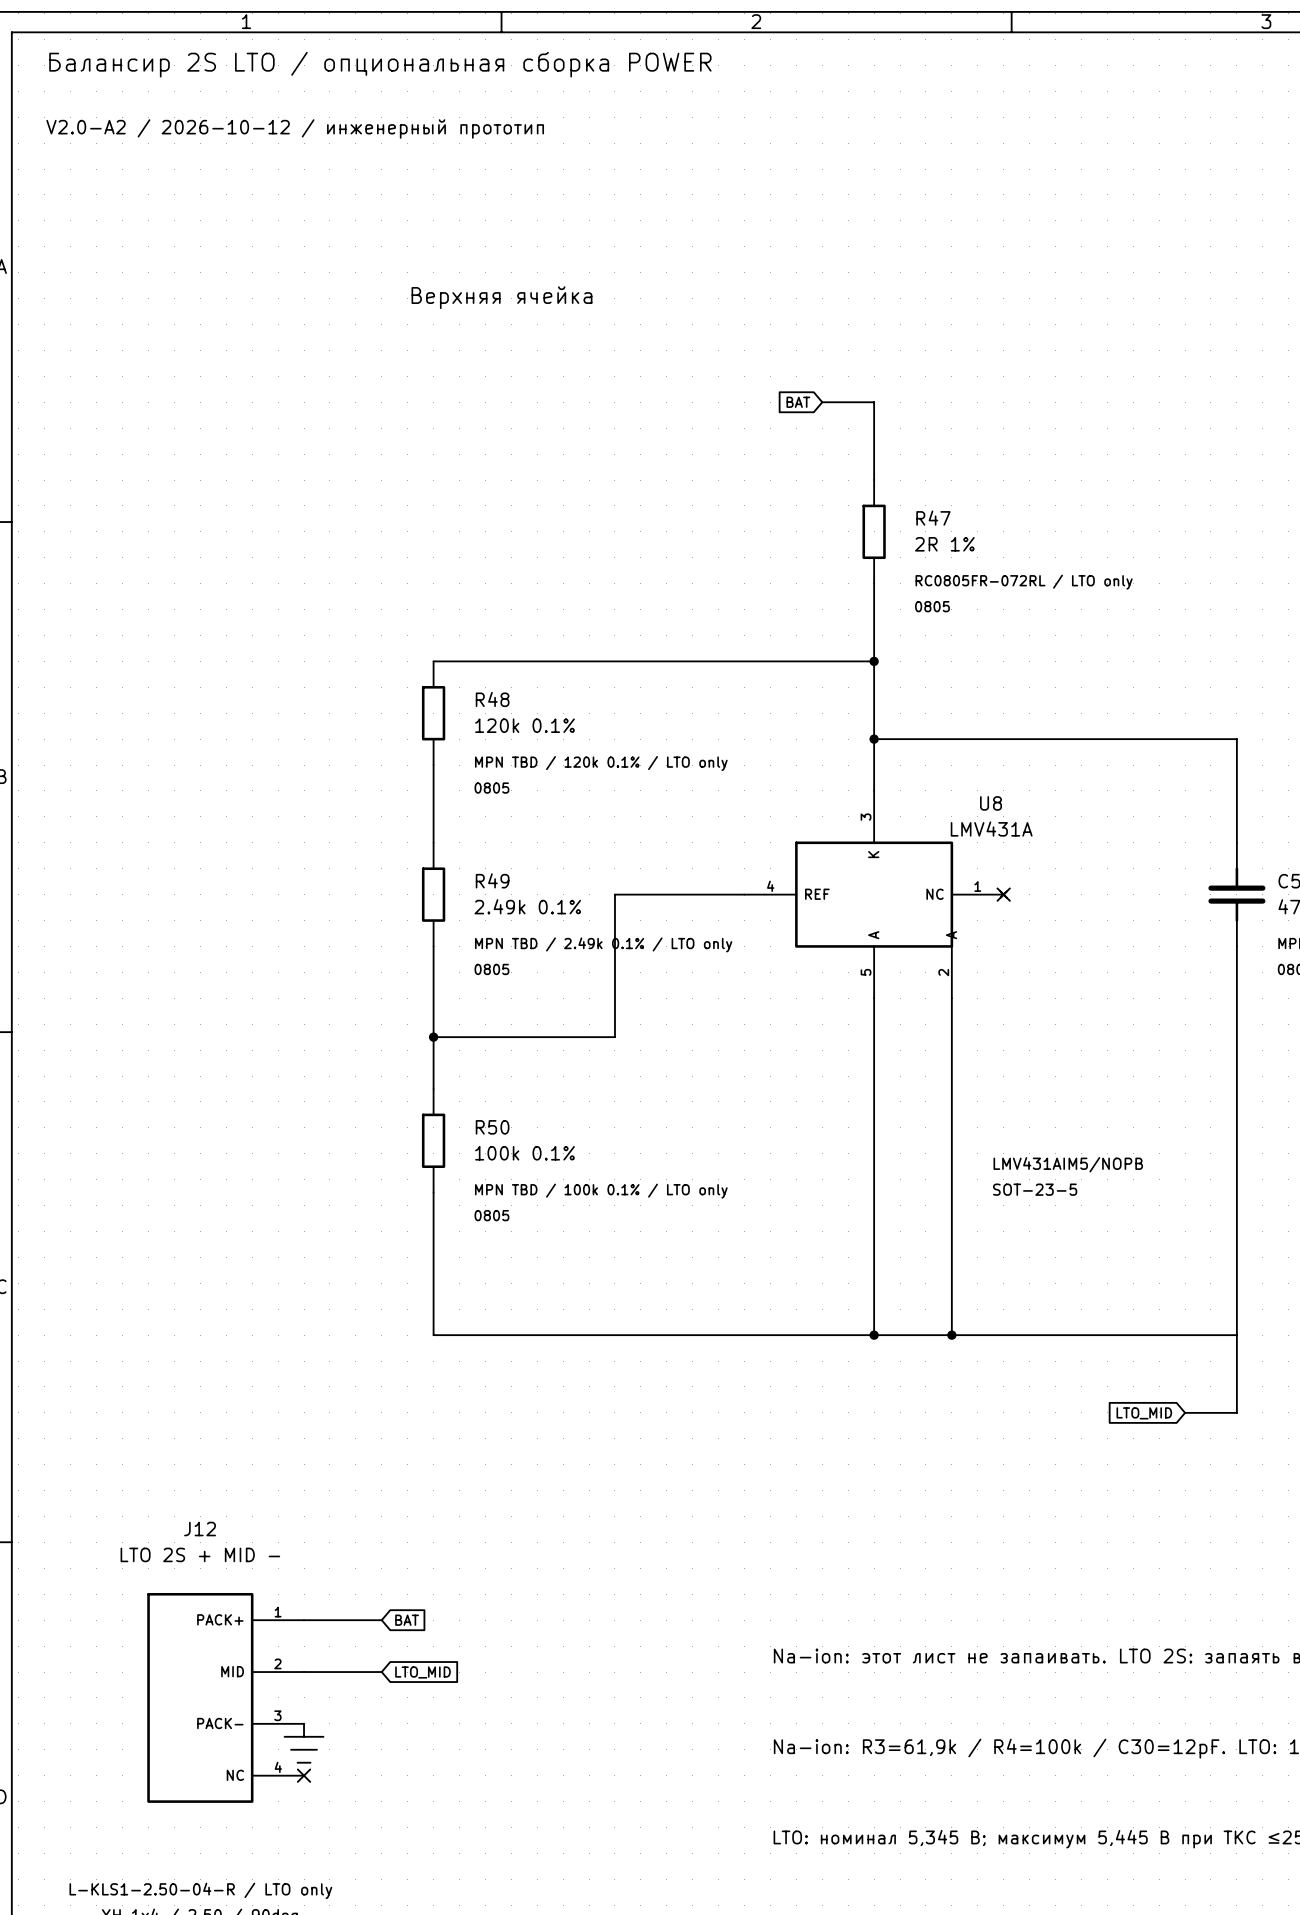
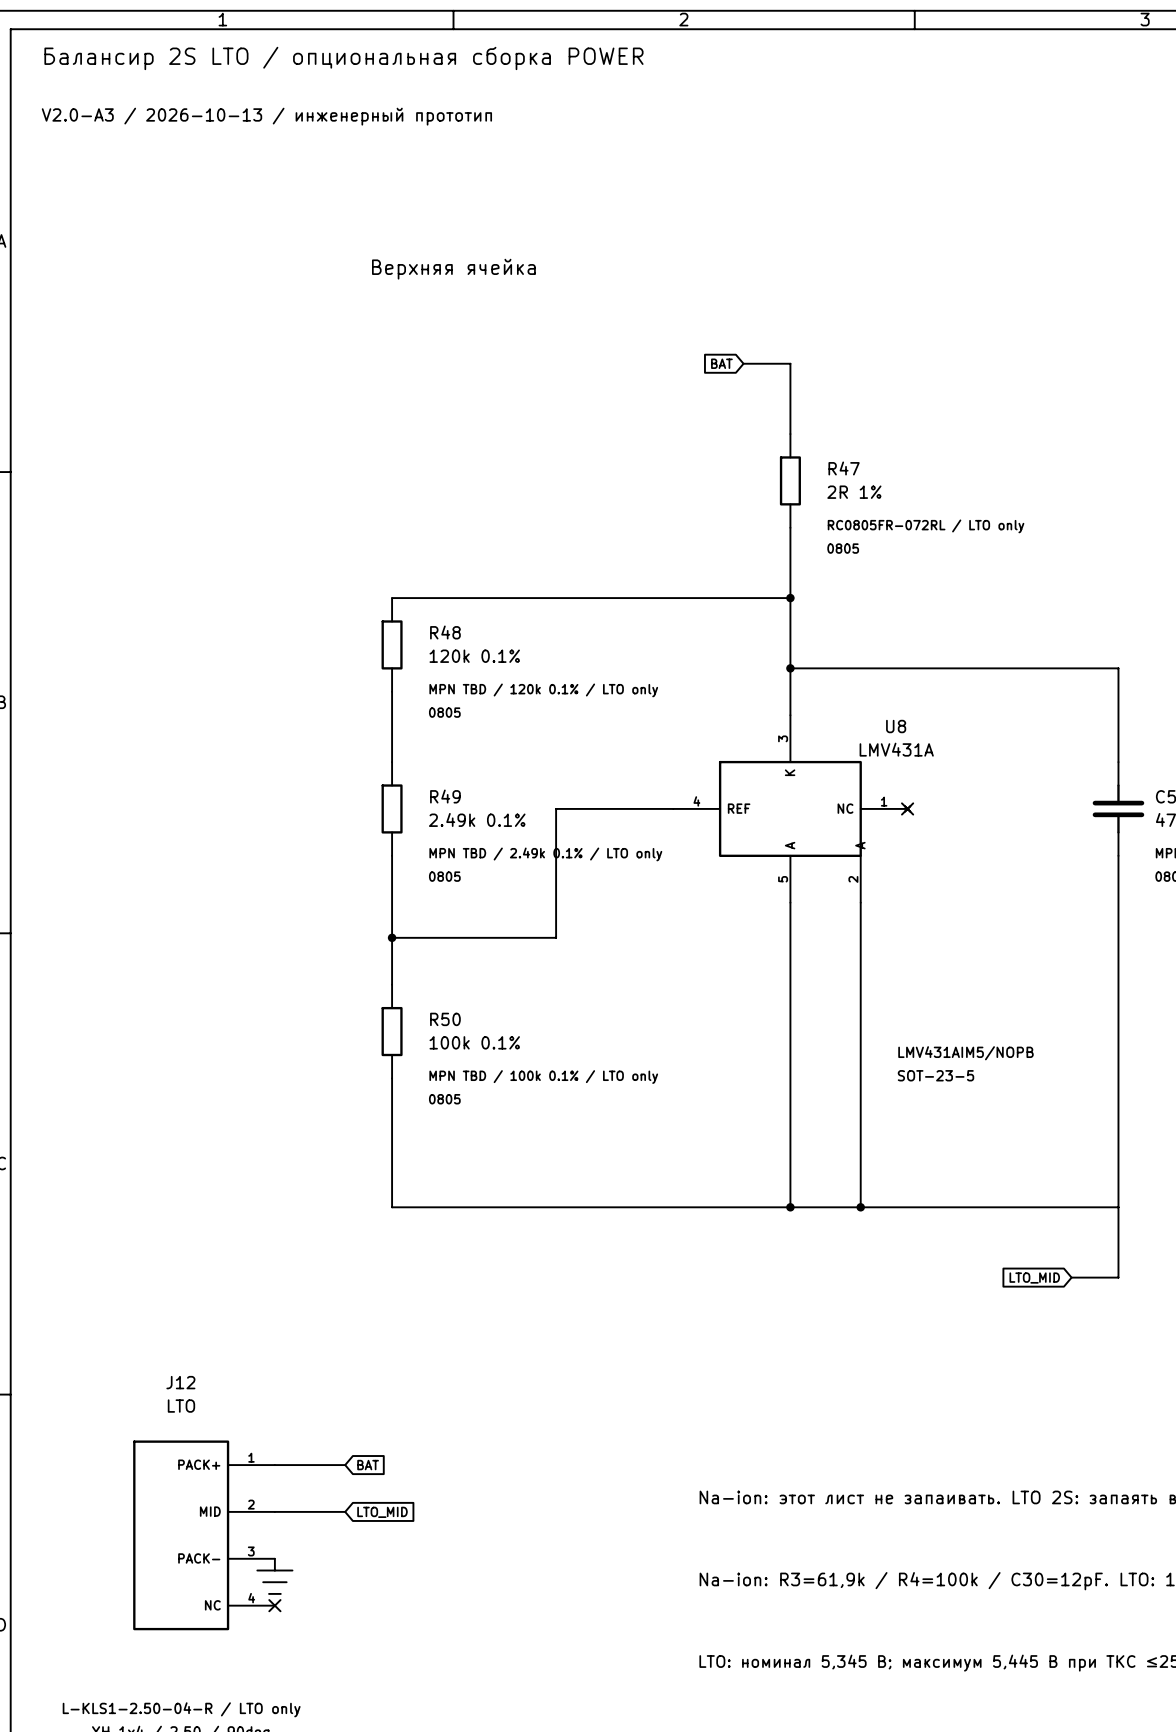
text: V2.0-A2 / 2026-10-12 / инженерный прототип (295, 128) -> V2.0-A3 / 2026-10-13 / инженерный прототип (266, 116)
J12 value: LTO 2S + MID - (200, 1554) -> LTO (181, 1406)

